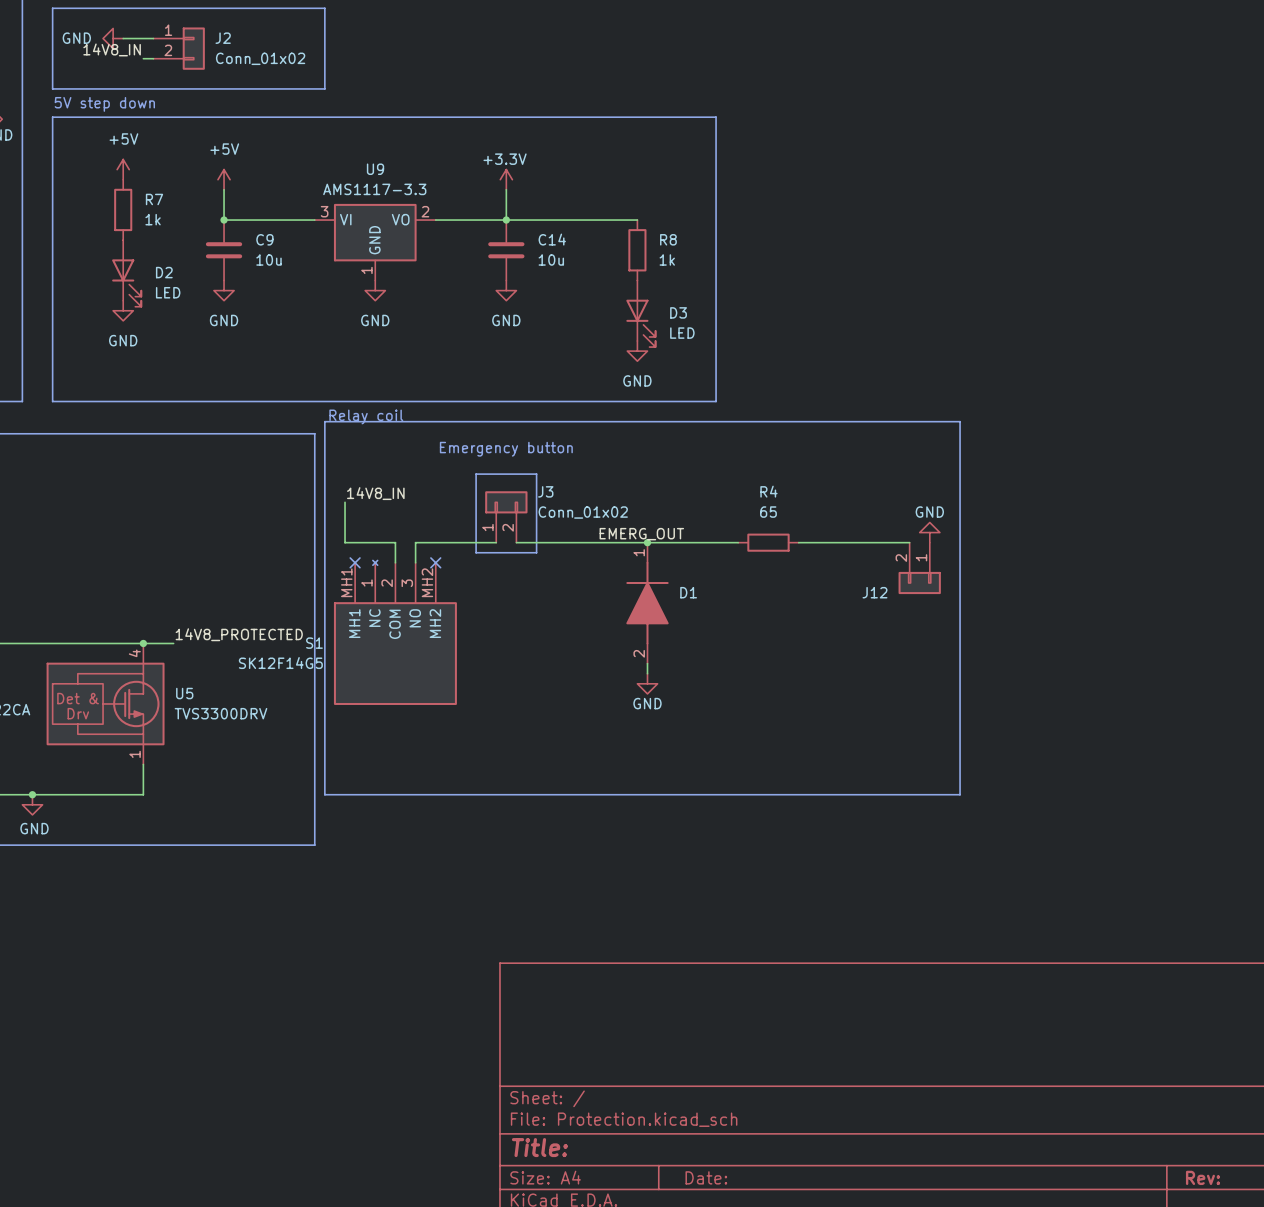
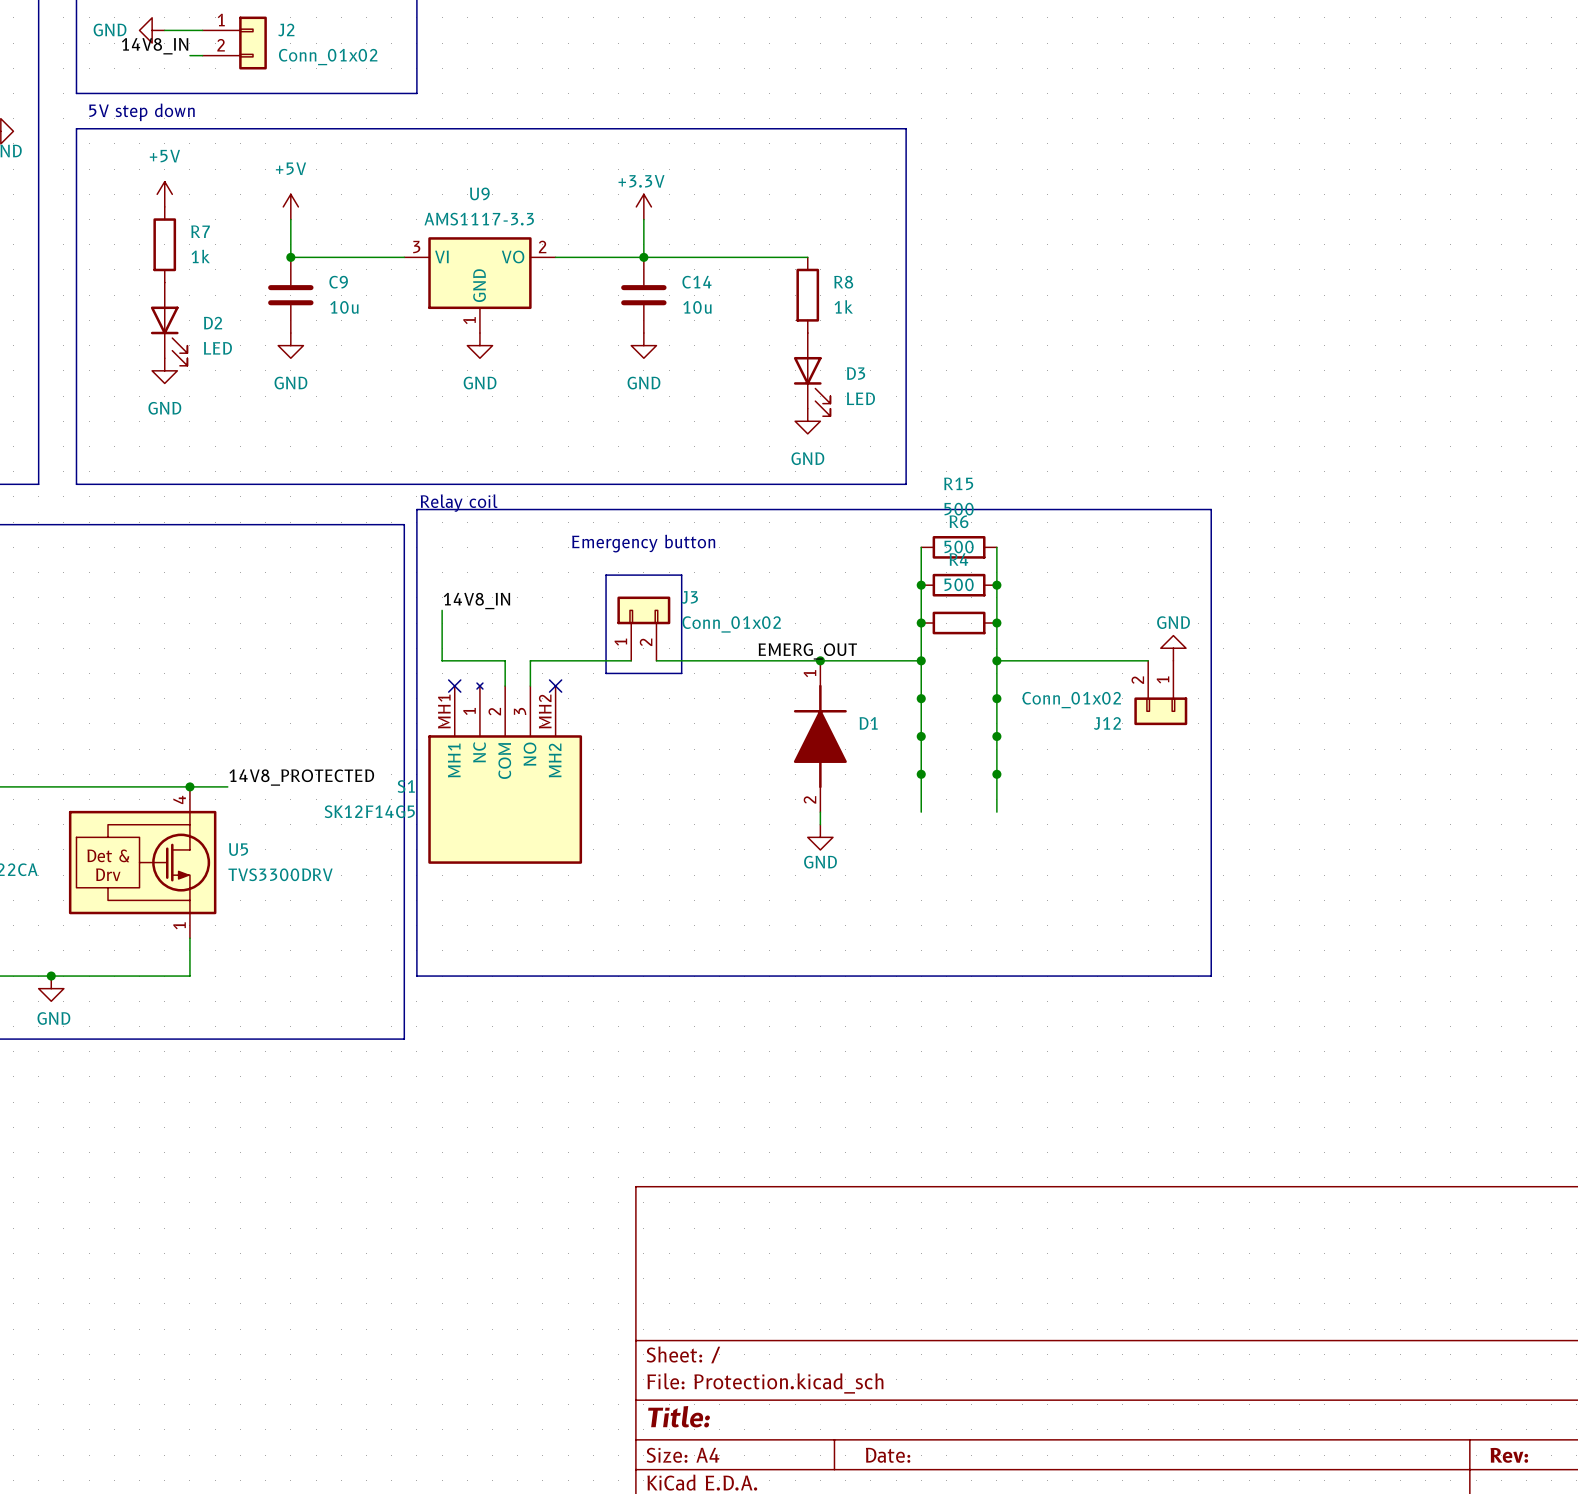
wire: none -> (921, 547) (921, 812)
R15: none -> 500 (959, 547)
wire: none -> (996, 547) (996, 812)
junction: none -> (921, 585)
R6: none -> 500 (959, 585)
junction: none -> (996, 585)
junction: none -> (921, 623)
R4 value: 65 (768, 512) -> 500 (959, 584)
junction: none -> (996, 623)
junction: none -> (921, 660)
R4 position: (768, 542) -> (959, 623)
junction: none -> (996, 660)
junction: none -> (921, 698)
junction: none -> (996, 698)
J12 value: none -> Conn_01x02 (1071, 700)
junction: none -> (921, 736)
junction: none -> (996, 736)
junction: none -> (921, 774)
junction: none -> (996, 774)

